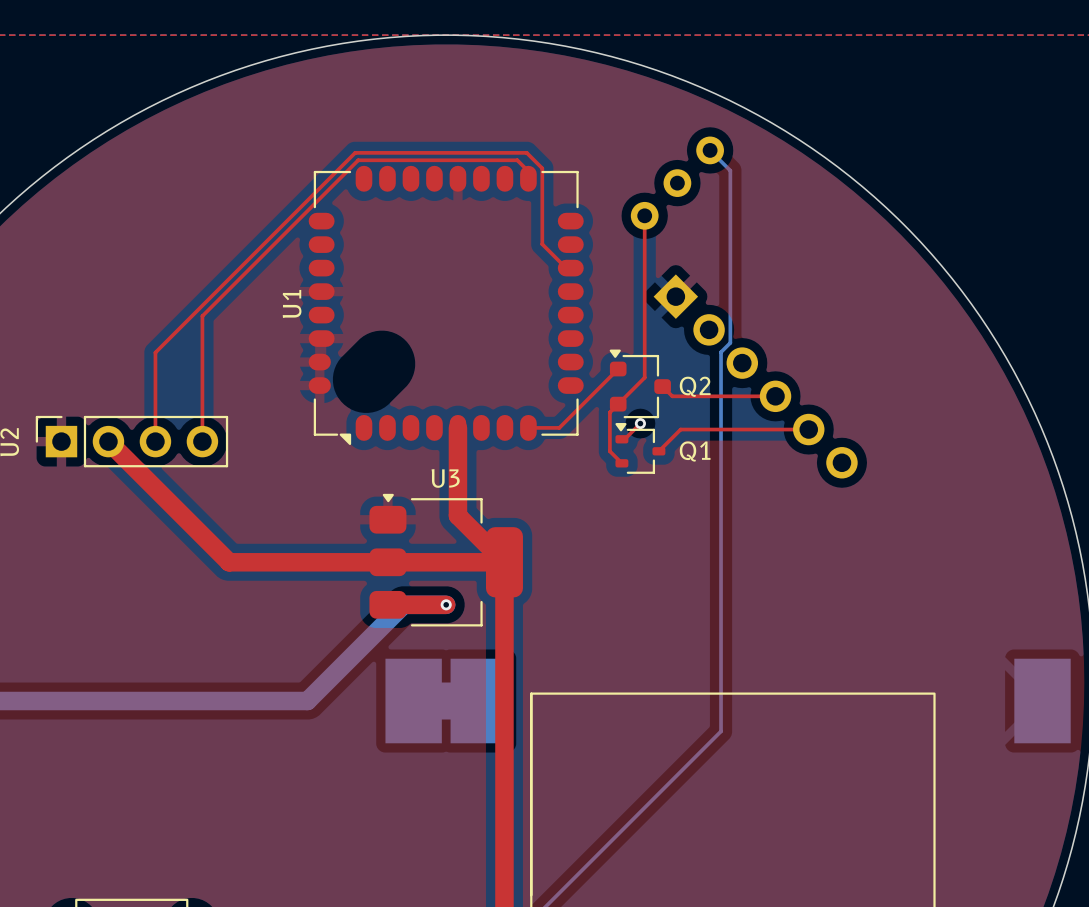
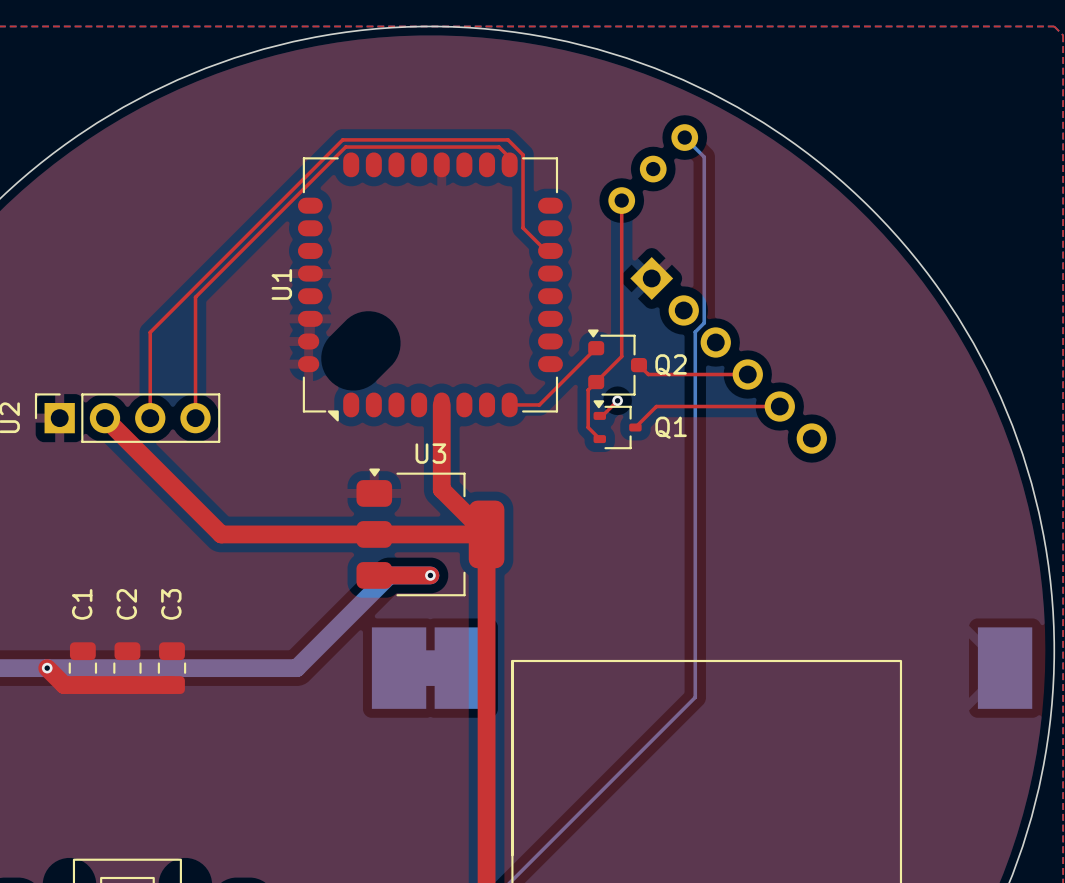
top track: none -> (47, 668) (64, 685) (171, 685)
via: none -> (47, 668)
C1: none -> (82, 668)
C2: none -> (127, 668)
C3: none -> (171, 668)

